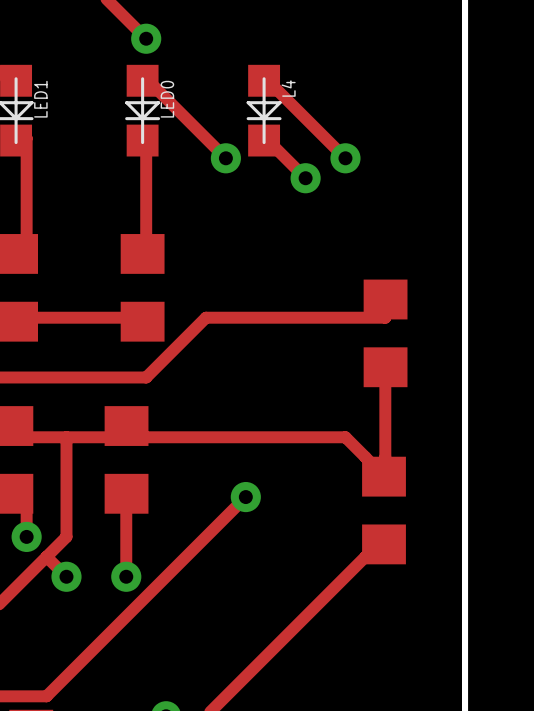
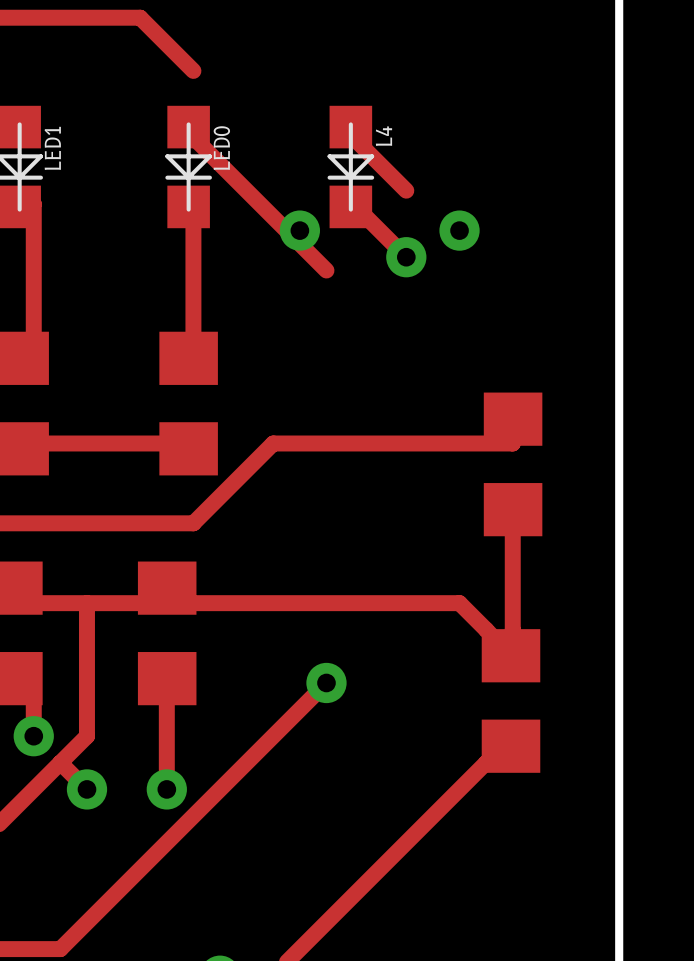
via: (146, 38) -> none
track: (142, 80) (146, 78) (225, 158) -> (188, 127) (193, 137) (326, 270)
track: (264, 80) (265, 78) (345, 158) -> (350, 127) (353, 137) (406, 190)

